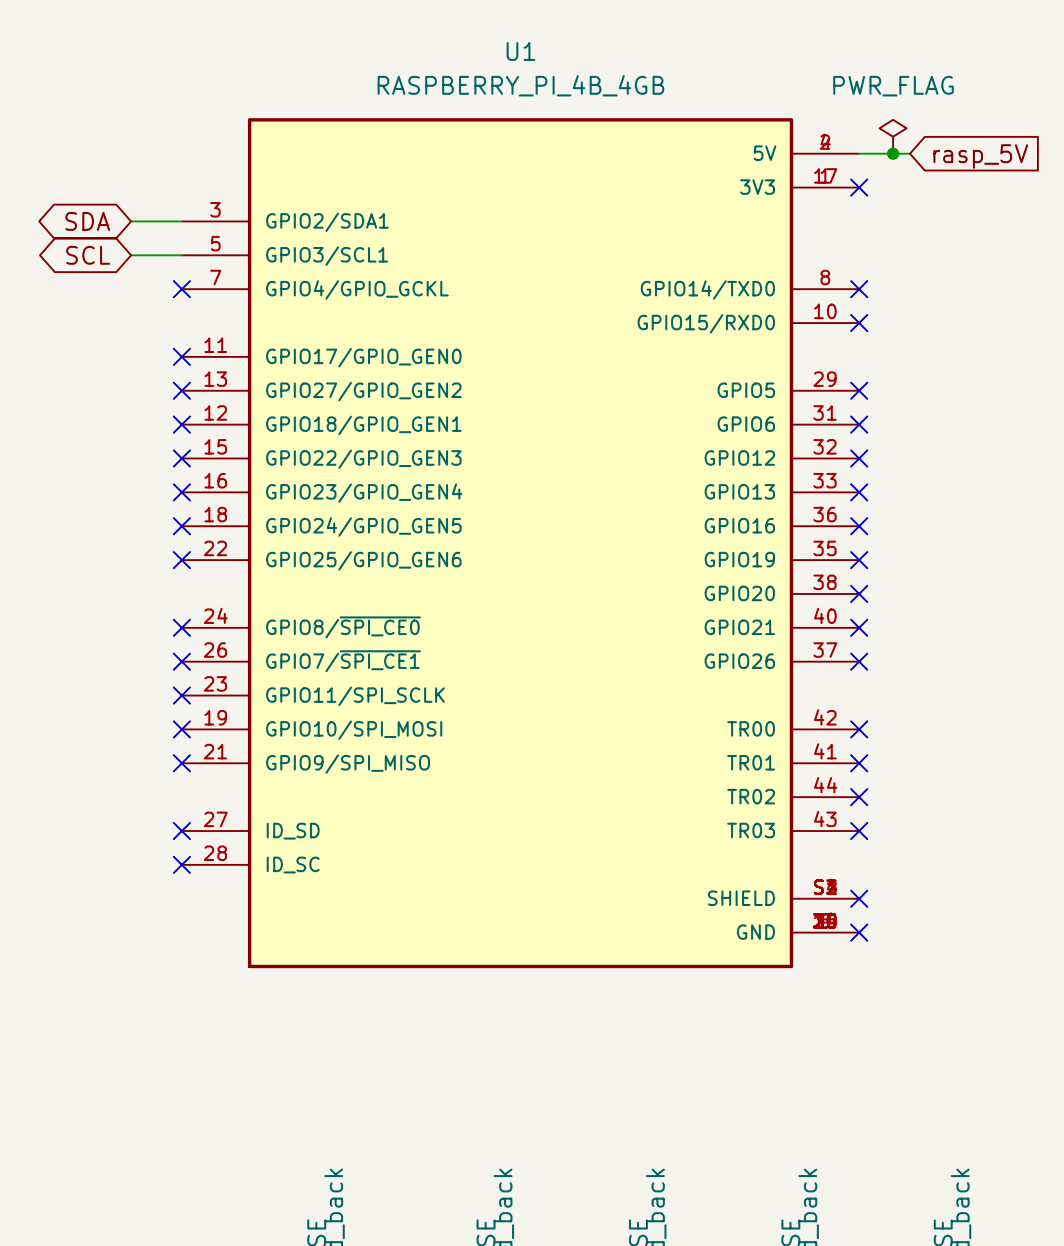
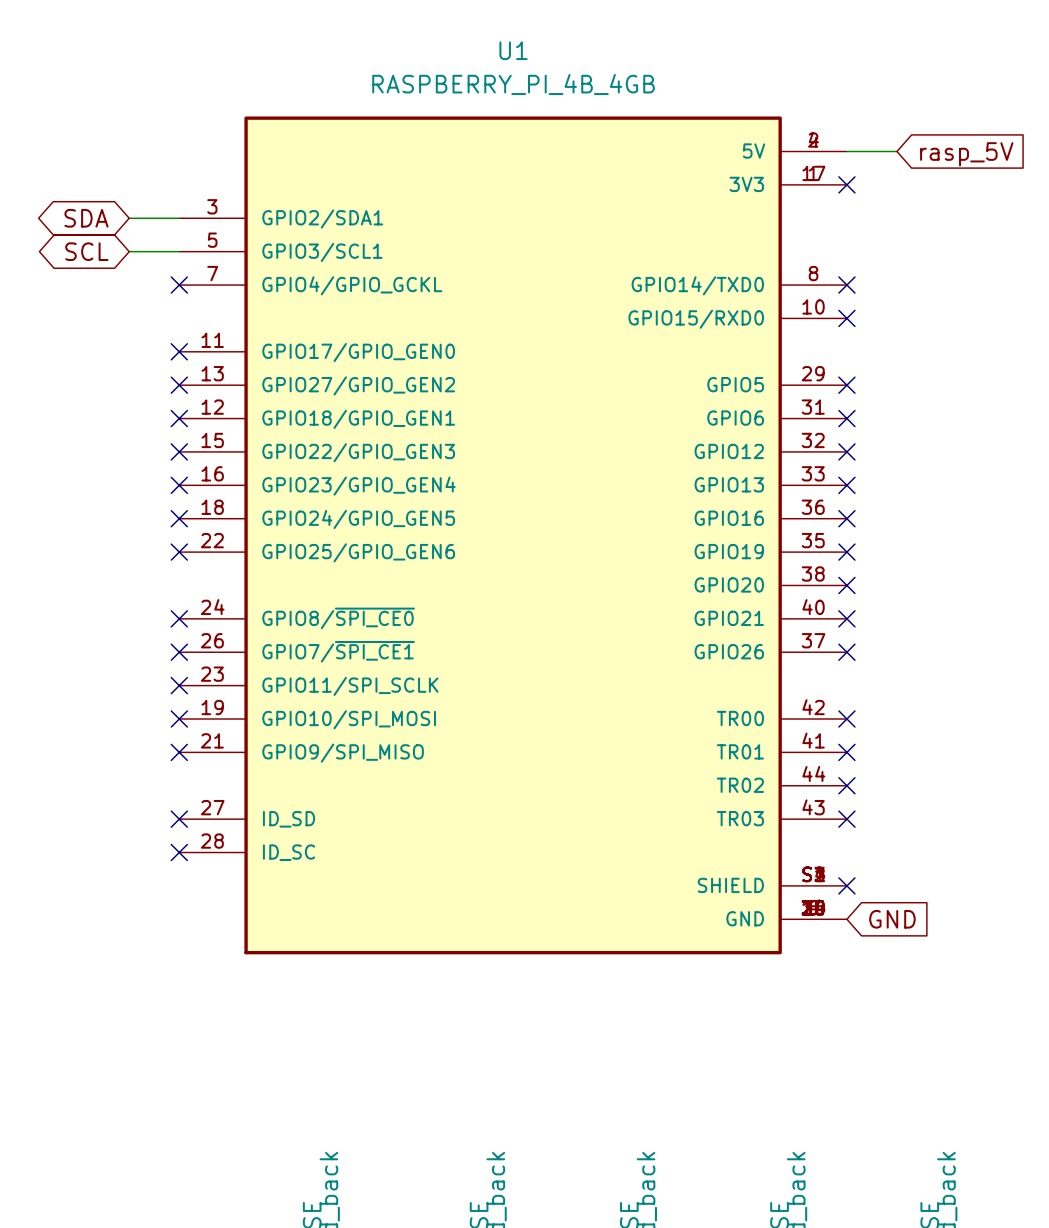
power symbol: PWR_FLAG (893, 136) -> none
junction: (893, 153) -> none
no-connect mark: (859, 932) -> none
global label: none -> GND (892, 919)

